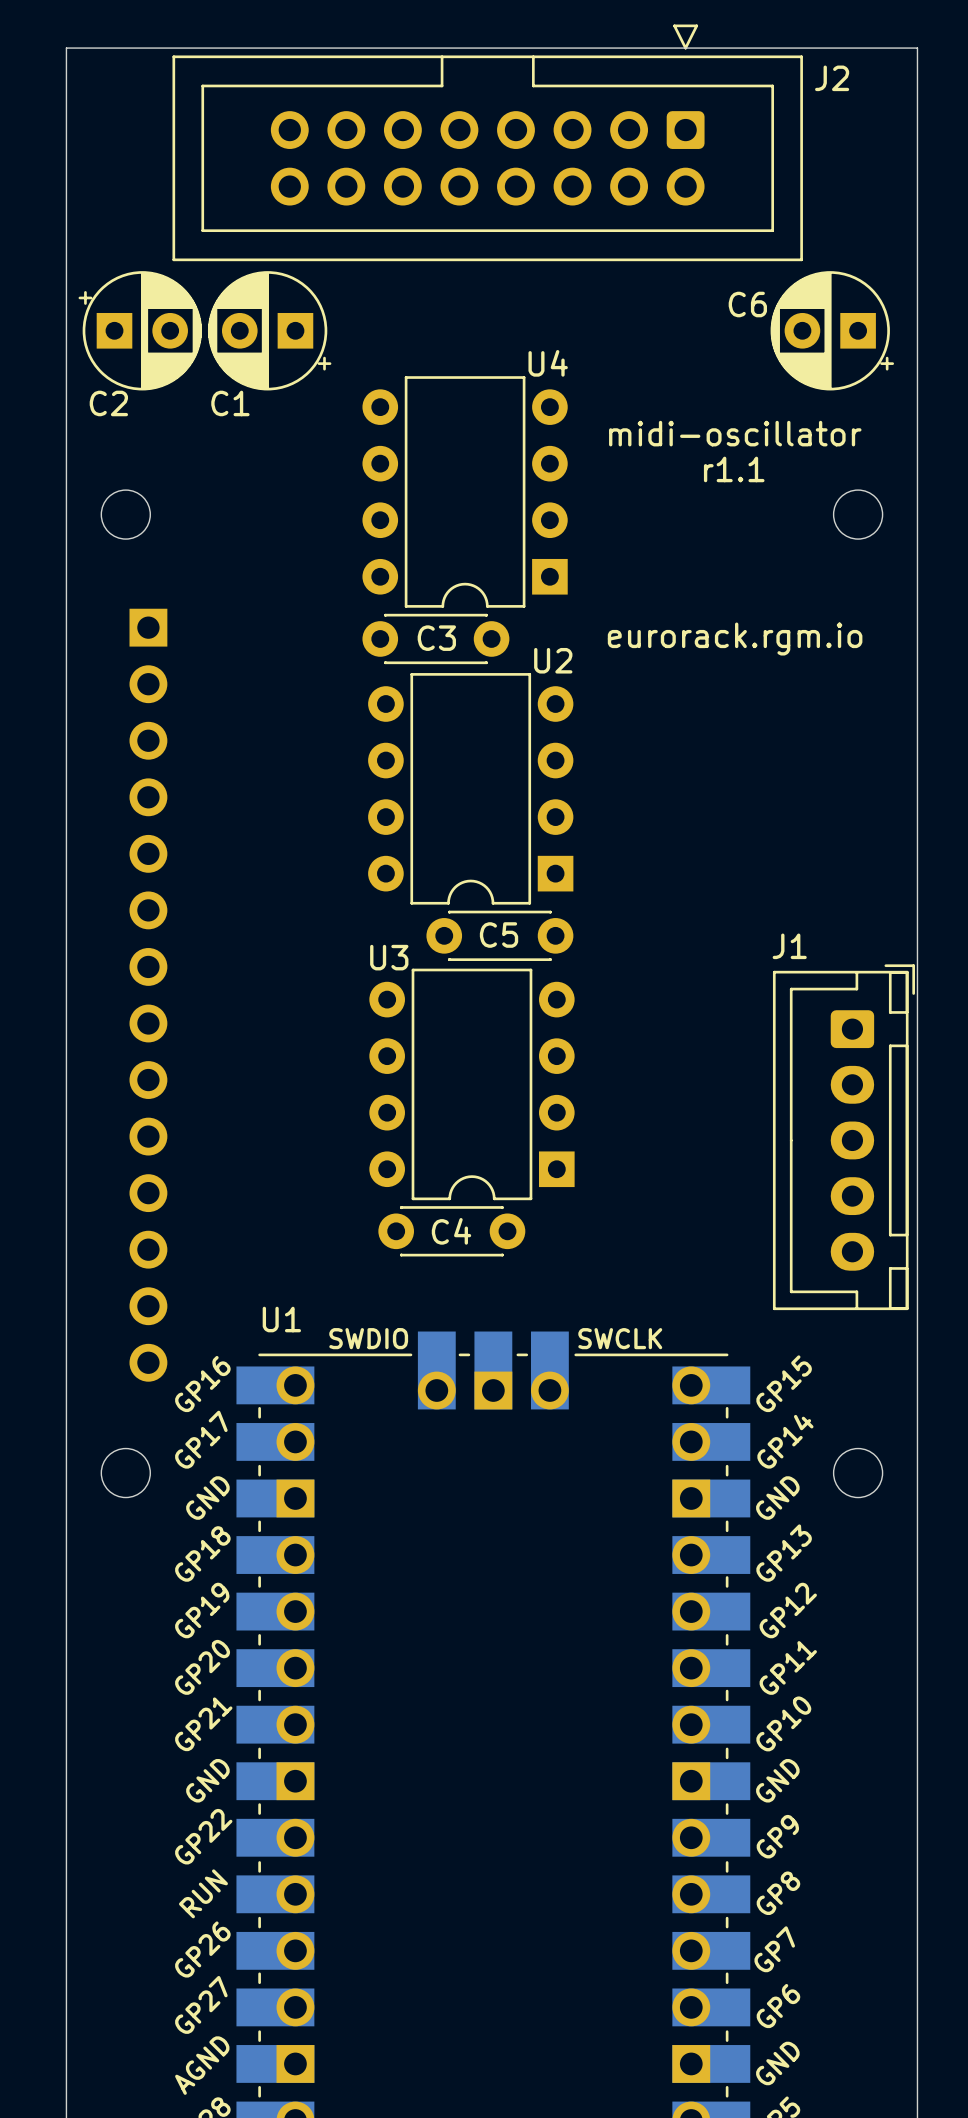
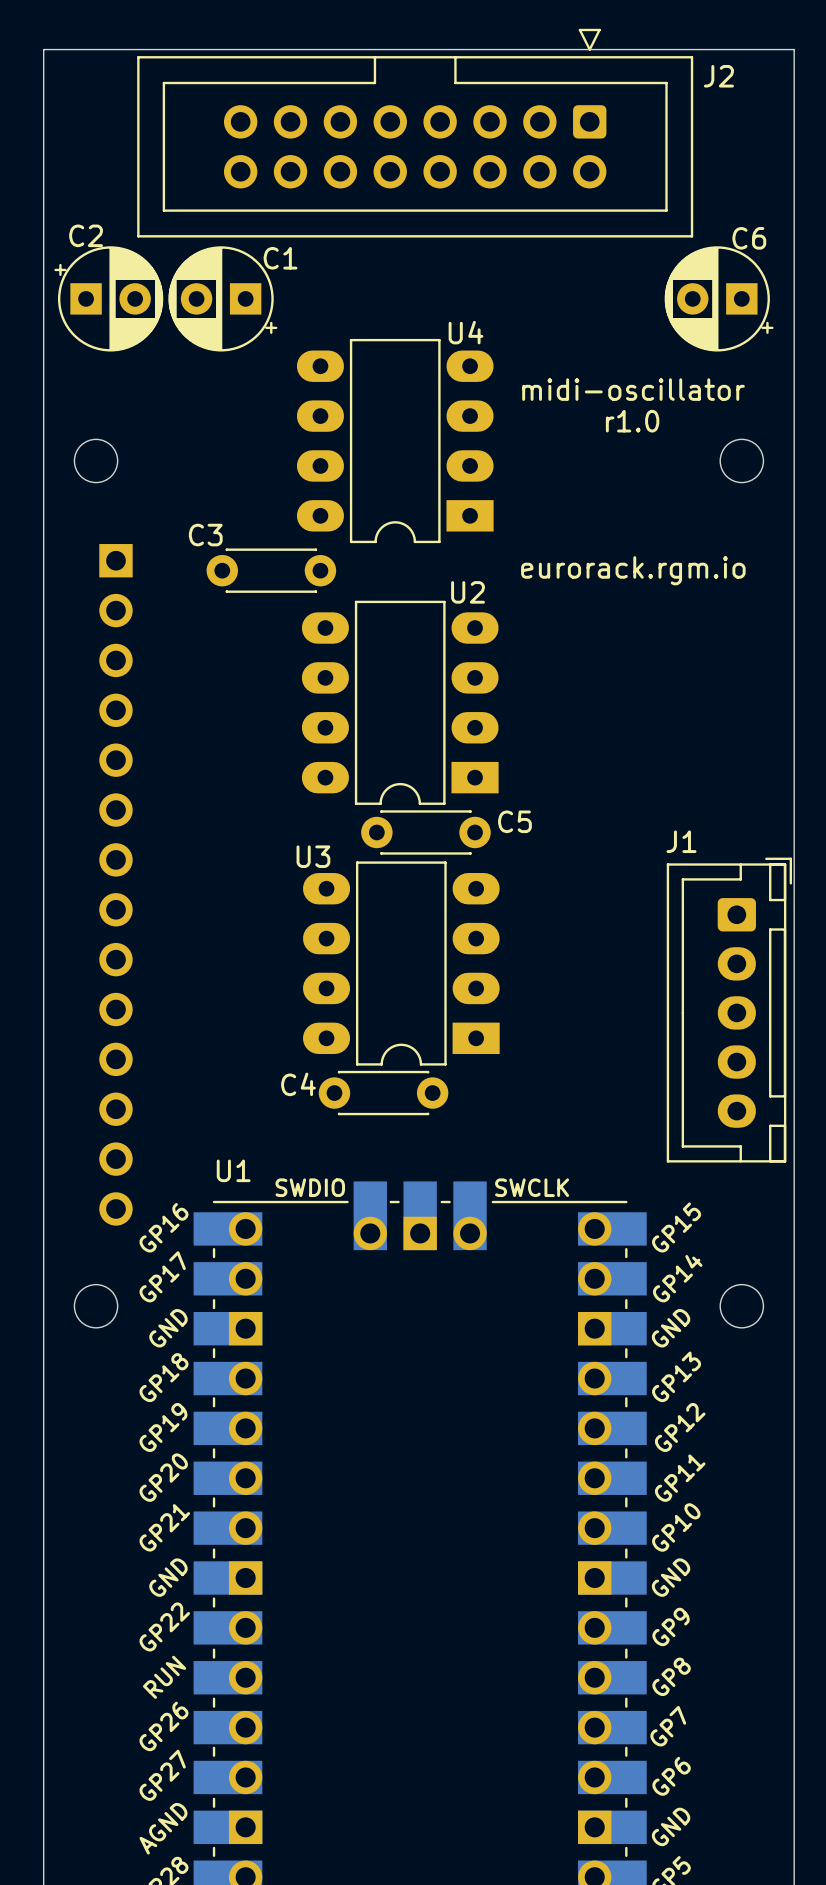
C6 name position: C6 (747, 304) -> C6 (749, 238)
U4 footprint: [362, 376, 568, 608] -> [296, 338, 494, 544]
C2 name position: C2 (108, 403) -> C2 (86, 235)
C1 name position: C1 (230, 403) -> C1 (280, 258)
text: r1.1 (734, 469) -> r1.0 (632, 421)
C3 position: (435, 638) -> (271, 570)
C3 name position: C3 (436, 638) -> C3 (205, 535)
U2 footprint: [368, 673, 574, 905] -> [301, 600, 499, 805]
C5 name position: C5 (499, 935) -> C5 (514, 821)
U3 footprint: [369, 968, 575, 1201] -> [302, 861, 500, 1066]
C4 name position: C4 (451, 1231) -> C4 (298, 1084)

